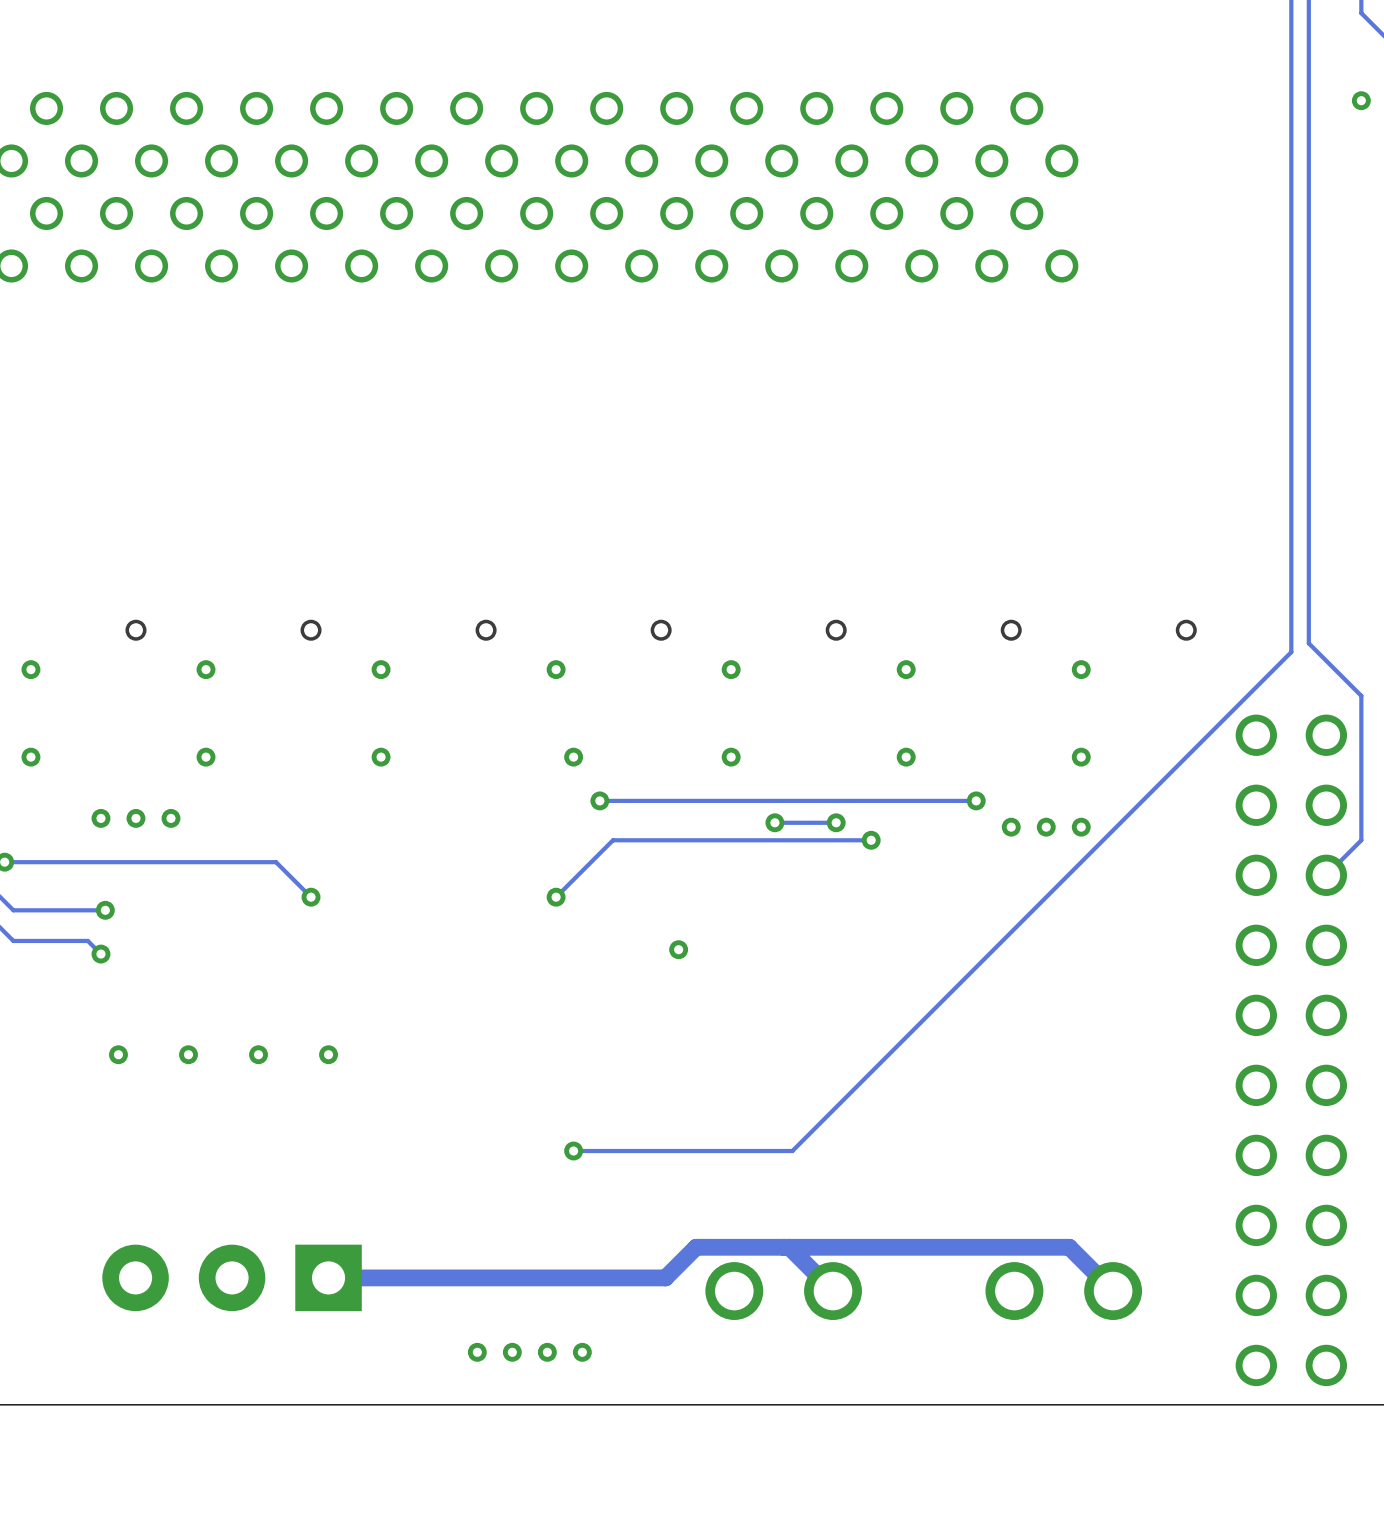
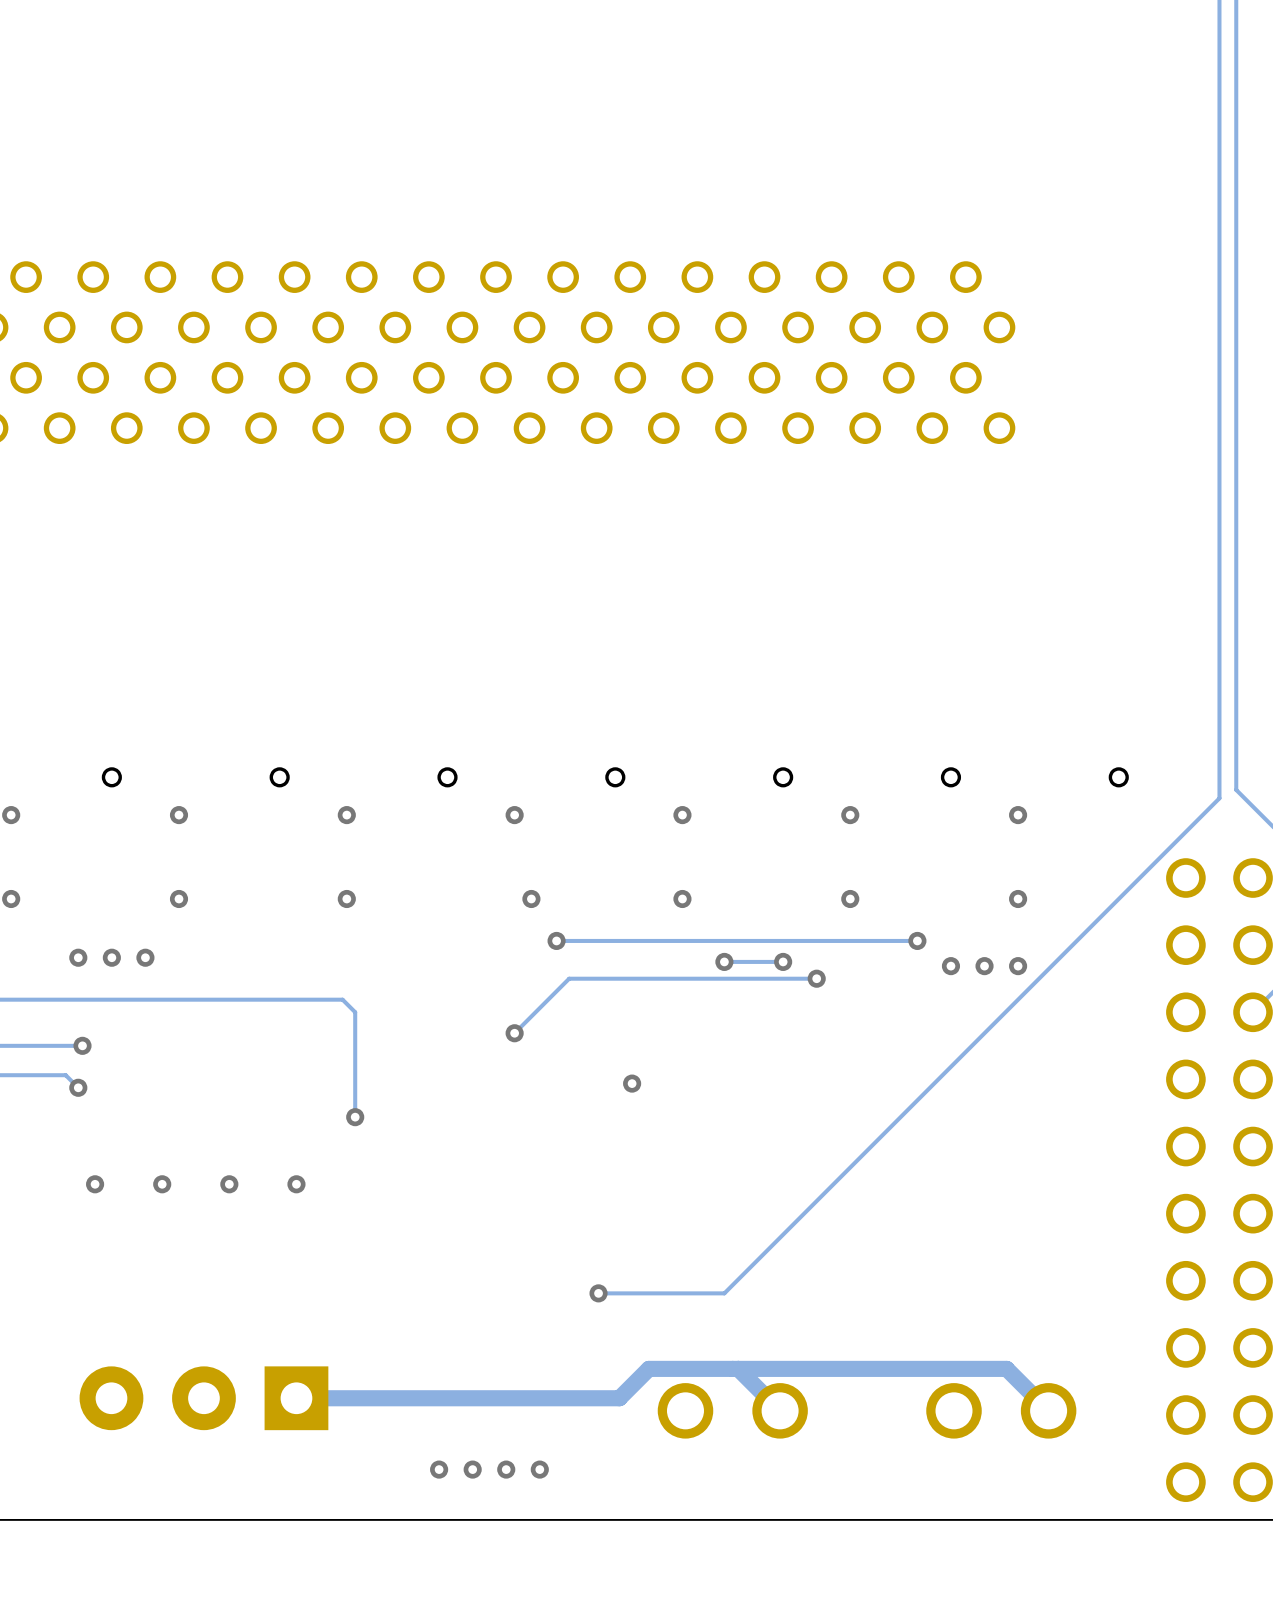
track: (276, 862) (311, 897) -> (246, 999) (342, 999) (355, 1012) (355, 1117)
via position: (311, 897) -> (355, 1117)
via position: (573, 1151) -> (598, 1293)
track: (792, 1151) (573, 1151) -> (741, 1276) (724, 1293) (598, 1293)

